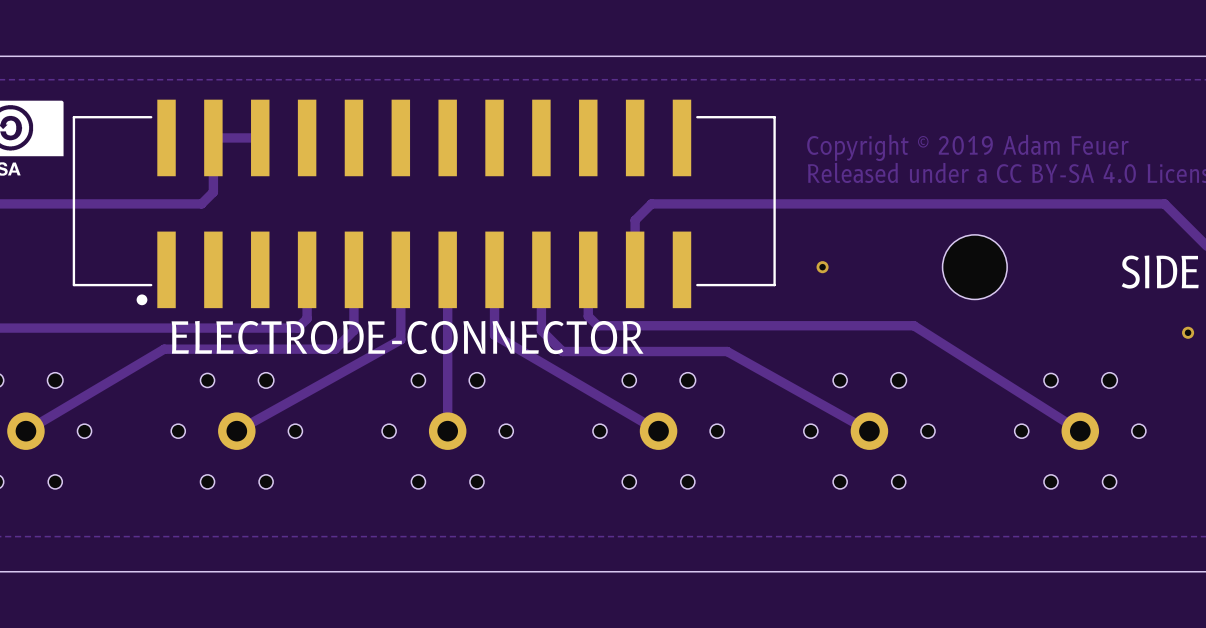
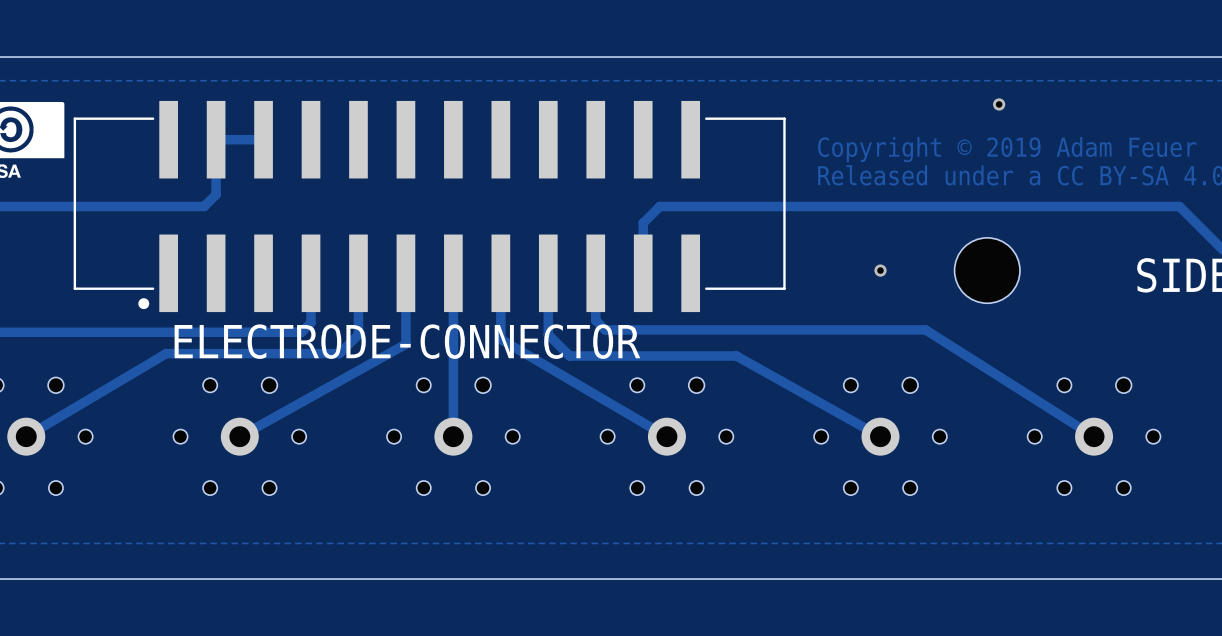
via: none -> (999, 104)
via position: (822, 267) -> (880, 270)
via: (1188, 332) -> none

